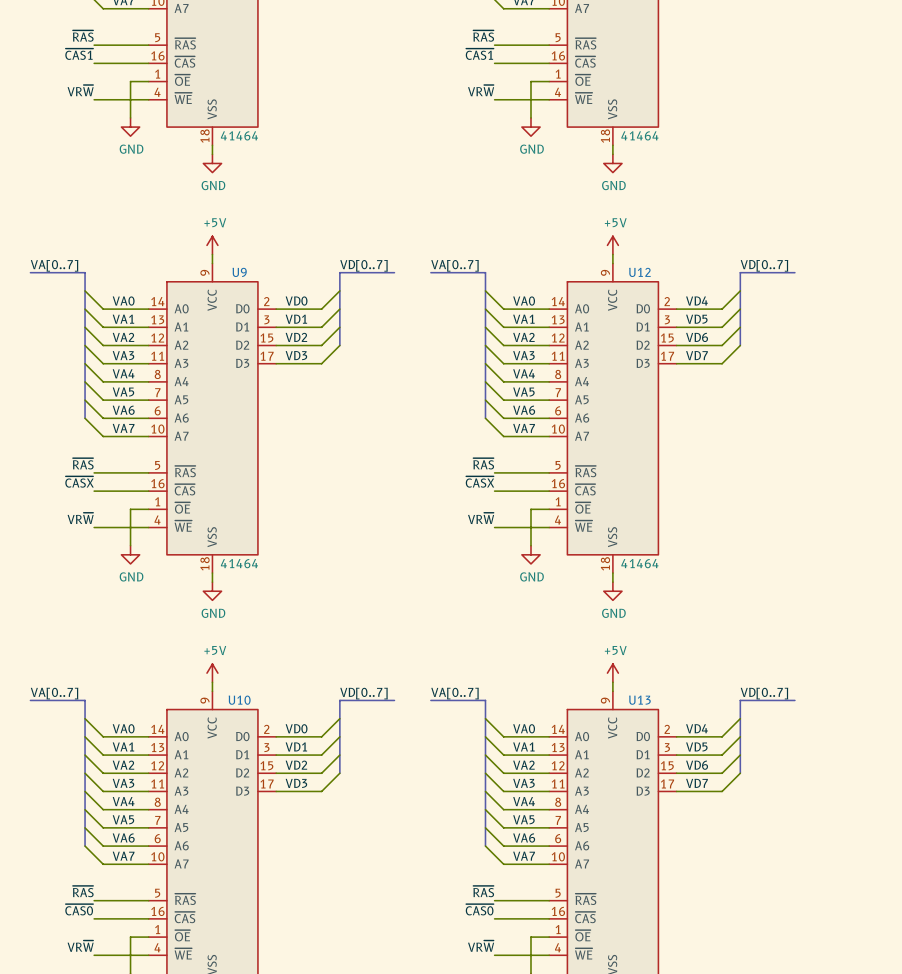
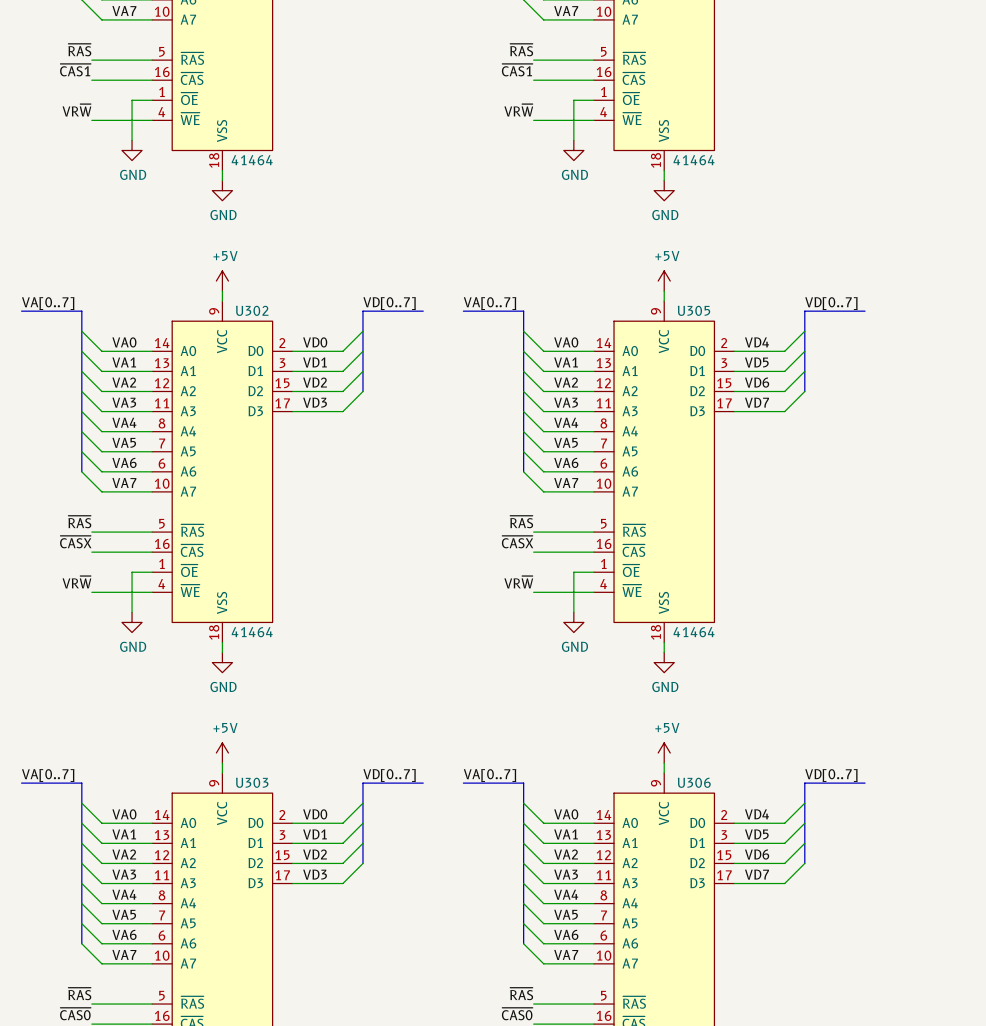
U9 name: U9 (239, 272) -> U302 (252, 310)
U12 name: U12 (639, 272) -> U305 (694, 310)
U10 name: U10 (239, 700) -> U303 (252, 782)
U13 name: U13 (639, 700) -> U306 (694, 782)

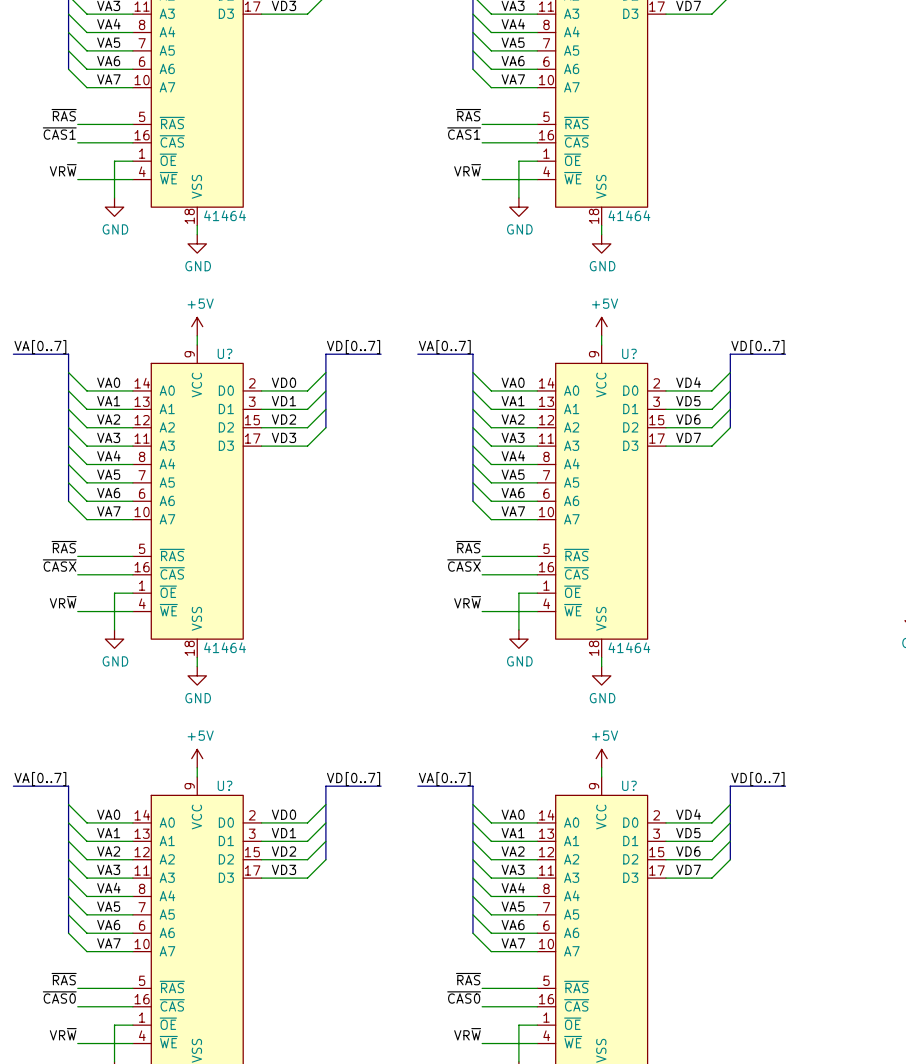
U302 name: U302 (252, 310) -> U? (225, 353)
U305 name: U305 (694, 310) -> U? (629, 353)
U303 name: U303 (252, 782) -> U? (225, 785)
U306 name: U306 (694, 782) -> U? (629, 785)

